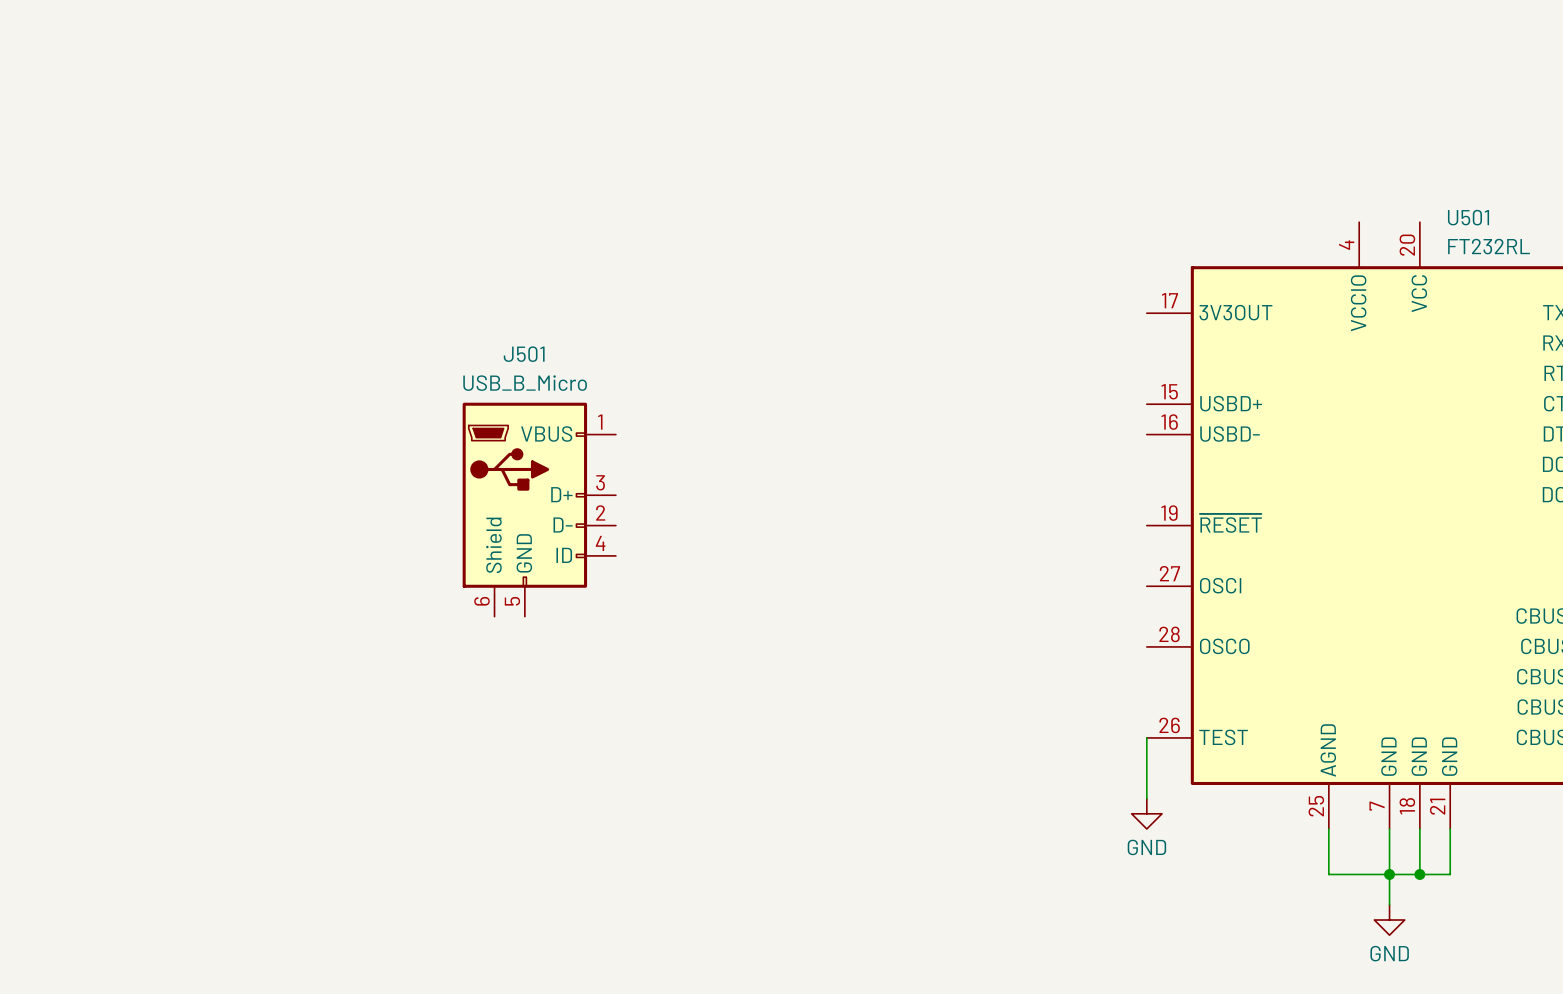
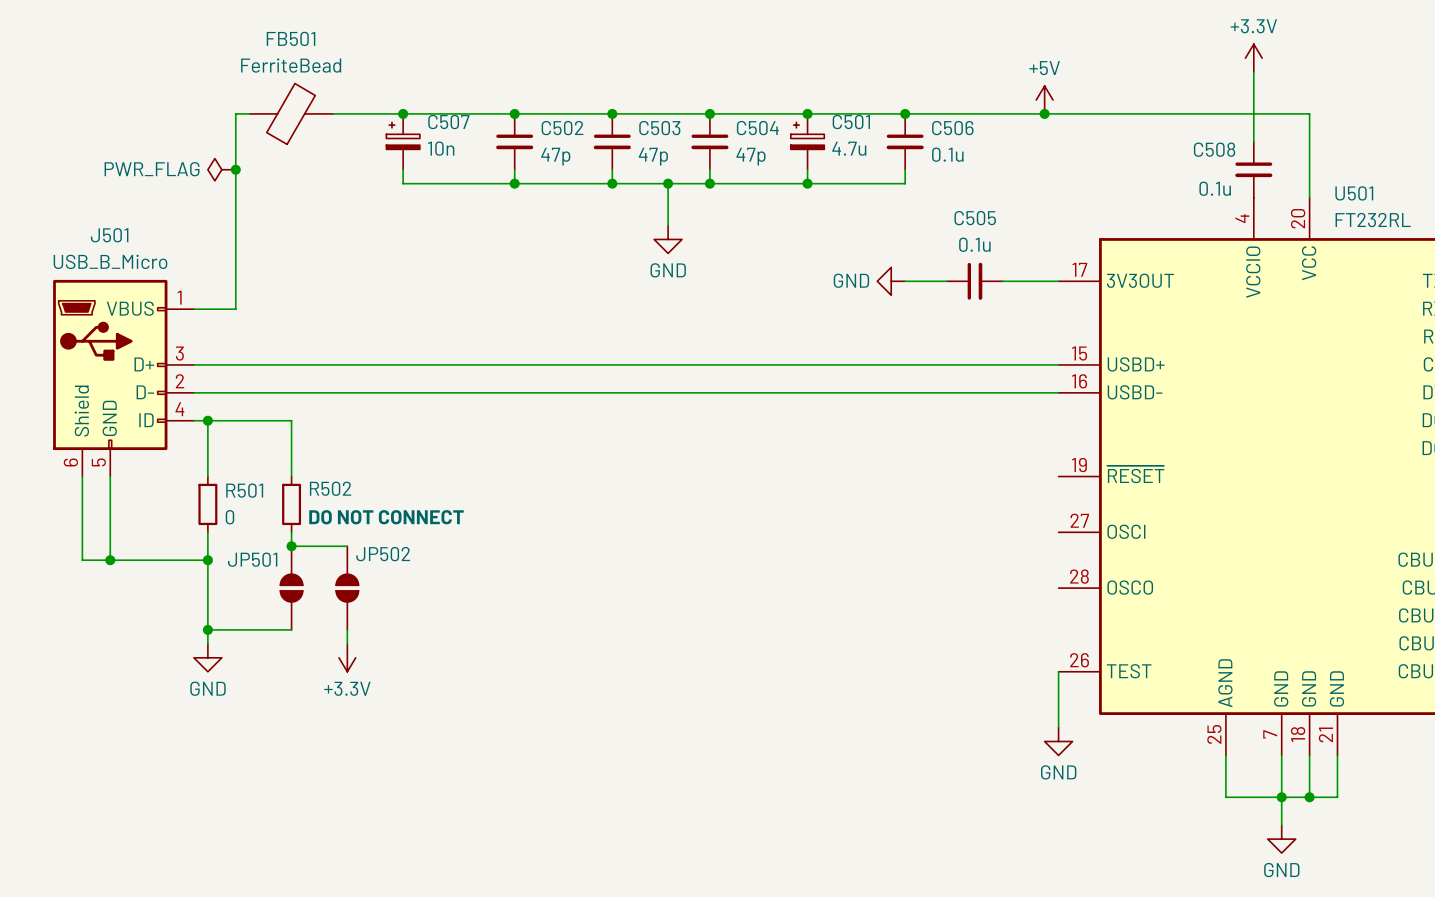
power symbol: none -> +3.3V (1253, 58)
wire: none -> (1253, 72) (1253, 141)
power symbol: none -> +5V (1044, 99)
wire: none -> (249, 113) (235, 113) (235, 309) (193, 309)
FB501: none -> FerriteBead (291, 113)
wire: none -> (333, 113) (1309, 113) (1309, 197)
junction: none -> (403, 113)
junction: none -> (514, 113)
junction: none -> (612, 113)
junction: none -> (709, 113)
junction: none -> (807, 113)
junction: none -> (905, 113)
junction: none -> (1044, 113)
C507: none -> 10n (403, 141)
C502: none -> 47p (514, 141)
C503: none -> 47p (612, 141)
C504: none -> 47p (709, 141)
C501: none -> 4.7u (807, 141)
C506: none -> 0.1u (905, 141)
power symbol: none -> PWR_FLAG (221, 169)
junction: none -> (235, 169)
wire: none -> (403, 169) (403, 183) (905, 183) (905, 169)
wire: none -> (514, 169) (514, 183)
wire: none -> (612, 169) (612, 183)
wire: none -> (709, 169) (709, 183)
wire: none -> (807, 169) (807, 183)
C508: none -> 0.1u (1253, 169)
junction: none -> (514, 183)
junction: none -> (612, 183)
wire: none -> (668, 183) (668, 225)
junction: none -> (668, 183)
junction: none -> (709, 183)
junction: none -> (807, 183)
power symbol: none -> GND (668, 239)
power symbol: none -> GND (891, 281)
wire: none -> (905, 281) (947, 281)
C505: none -> 0.1u (974, 281)
wire: none -> (1002, 281) (1058, 281)
wire: none -> (193, 364) (1058, 364)
wire: none -> (193, 392) (1058, 392)
wire: none -> (193, 420) (291, 420) (291, 476)
wire: none -> (207, 420) (207, 476)
junction: none -> (207, 420)
J501 position: (539, 509) -> (123, 378)
wire: none -> (82, 476) (82, 560) (207, 560)
wire: none -> (110, 476) (110, 560)
R501: none -> 0 (207, 504)
R502: none -> DO NOT CONNECT (291, 504)
wire: none -> (207, 532) (207, 643)
wire: none -> (291, 532) (291, 546) (347, 546)
junction: none -> (291, 546)
junction: none -> (110, 560)
junction: none -> (207, 560)
JP501: none -> (291, 588)
JP502: none -> (347, 588)
wire: none -> (207, 629) (291, 629)
junction: none -> (207, 629)
wire: none -> (347, 629) (347, 643)
power symbol: none -> GND (207, 657)
power symbol: none -> +3.3V (347, 657)

